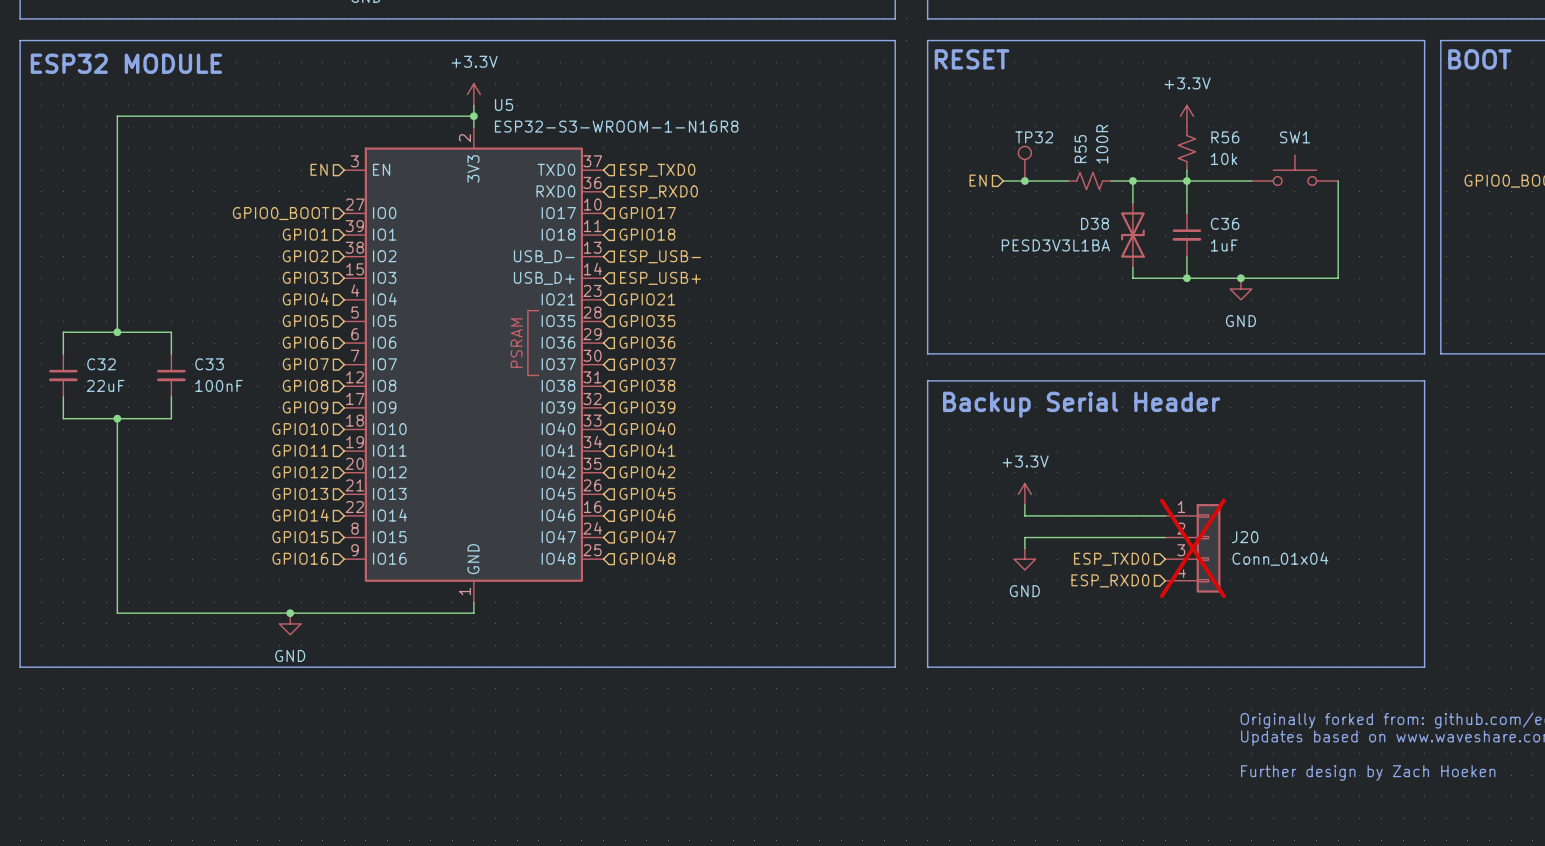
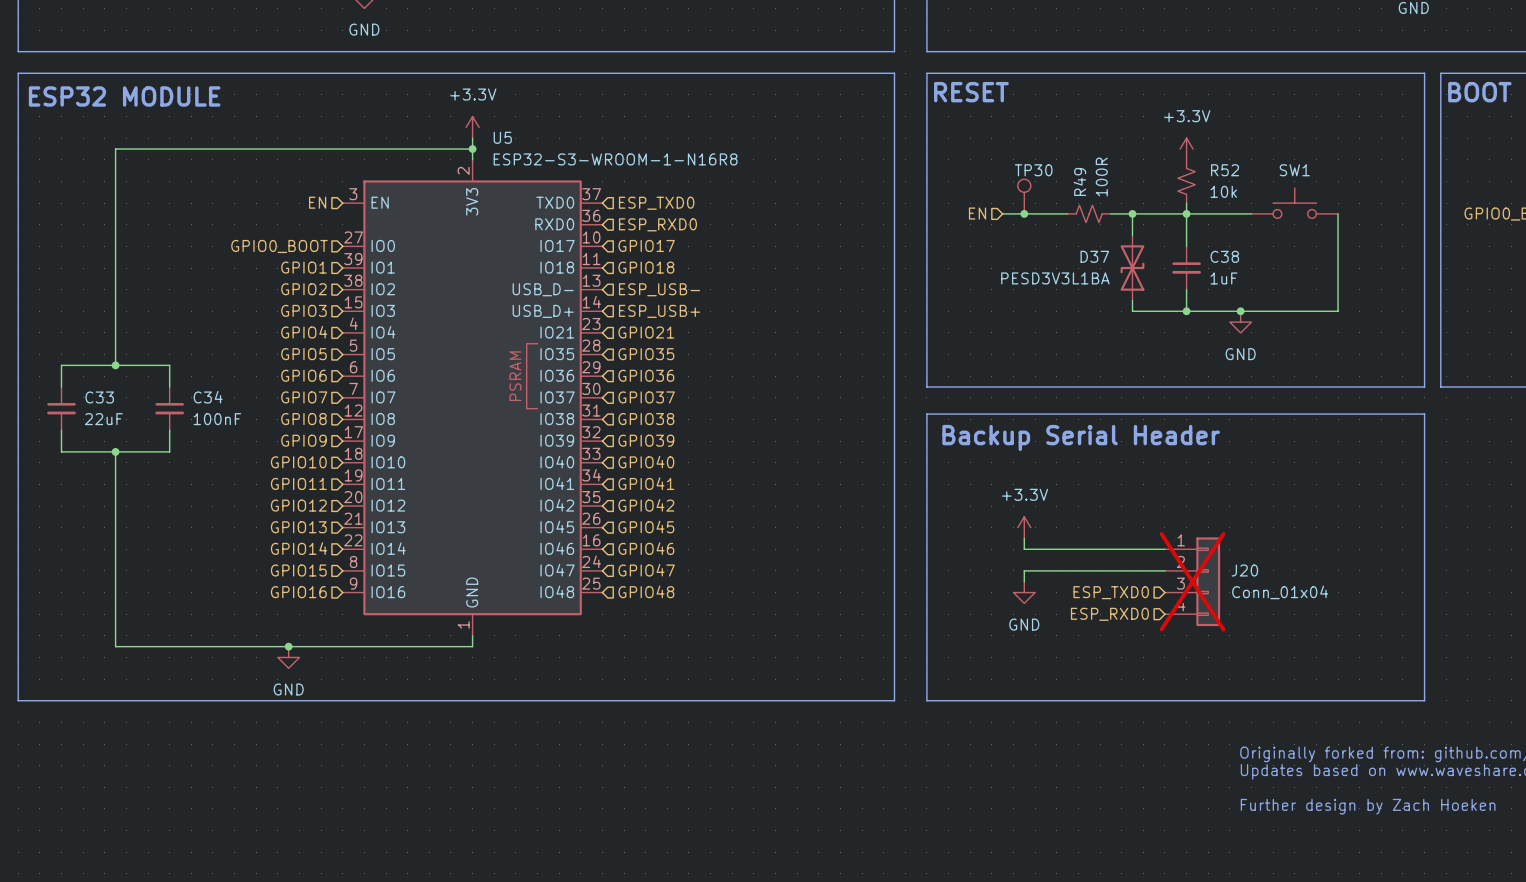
TP32 name: TP32 (1034, 137) -> TP30 (1033, 170)
R56 name: R56 (1225, 137) -> R52 (1225, 170)
R55 name: R55 (1080, 149) -> R49 (1079, 181)
D38 name: D38 (1095, 223) -> D37 (1094, 256)
C36 name: C36 (1225, 223) -> C38 (1224, 256)
C32 name: C32 (101, 364) -> C33 (99, 397)
C33 name: C33 (209, 364) -> C34 (208, 397)

